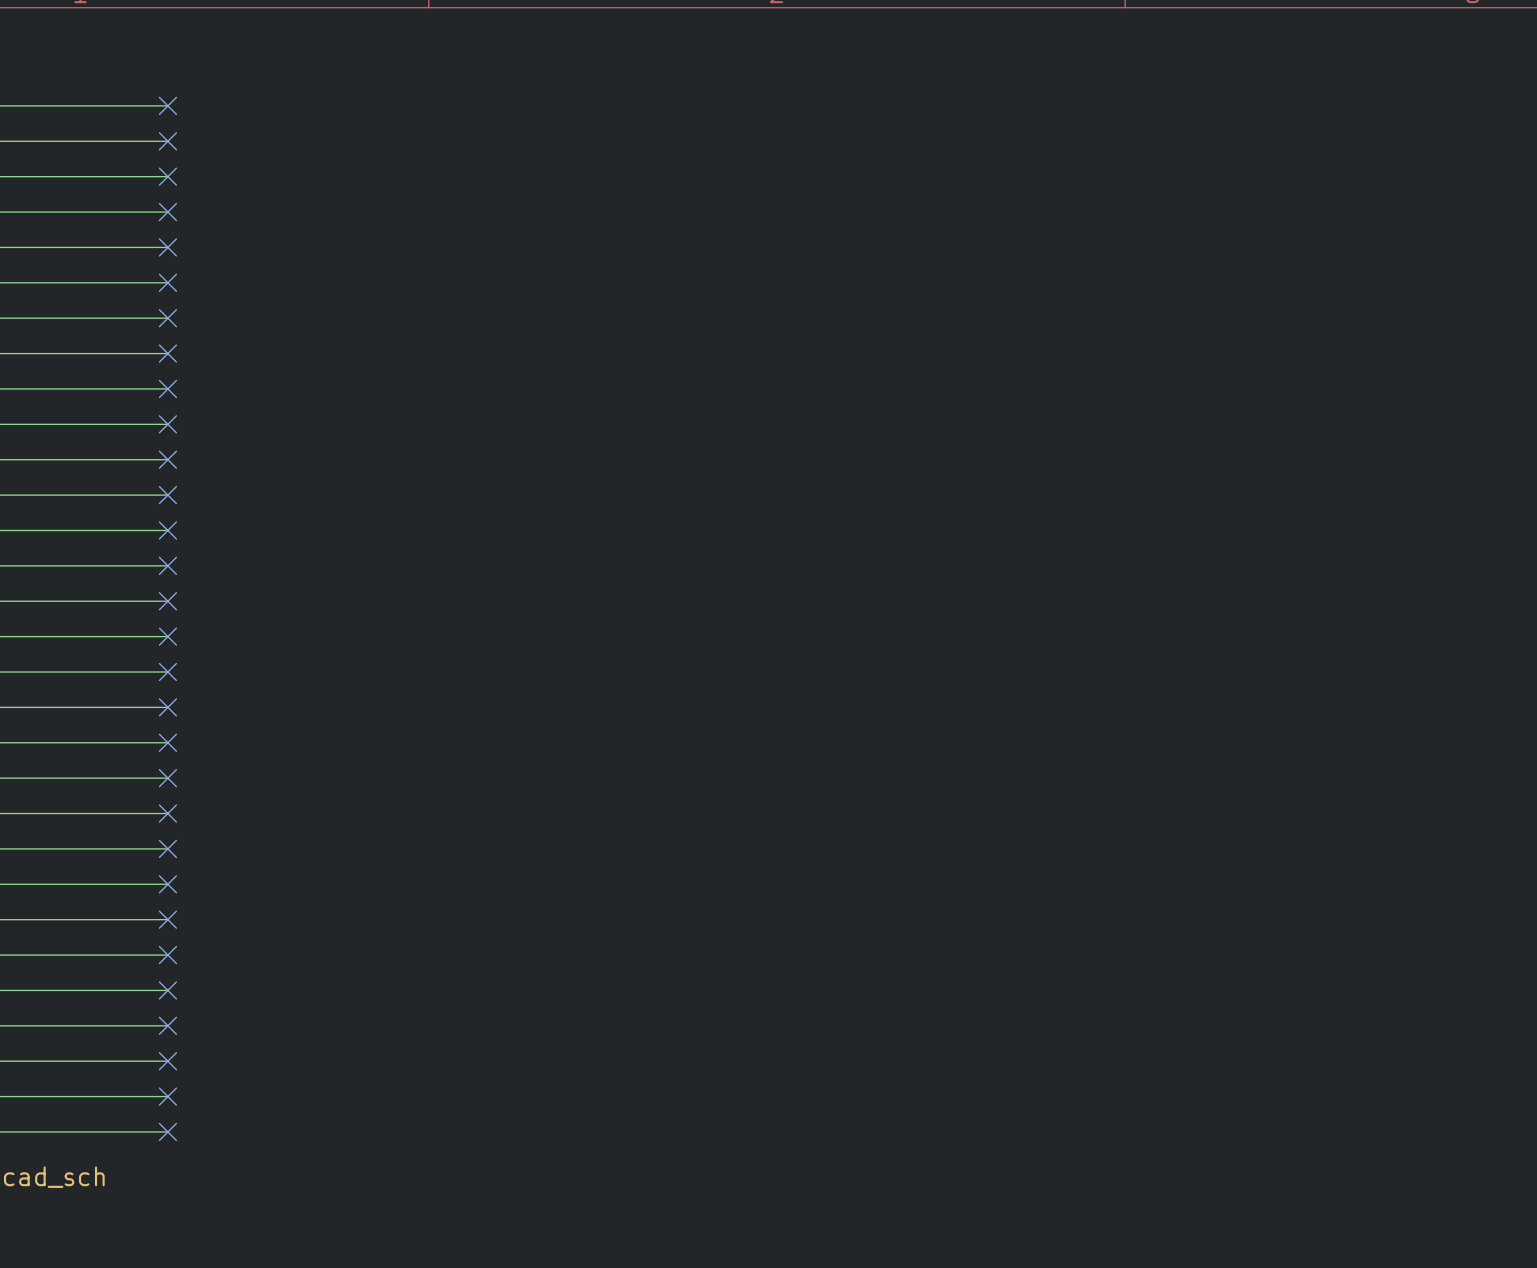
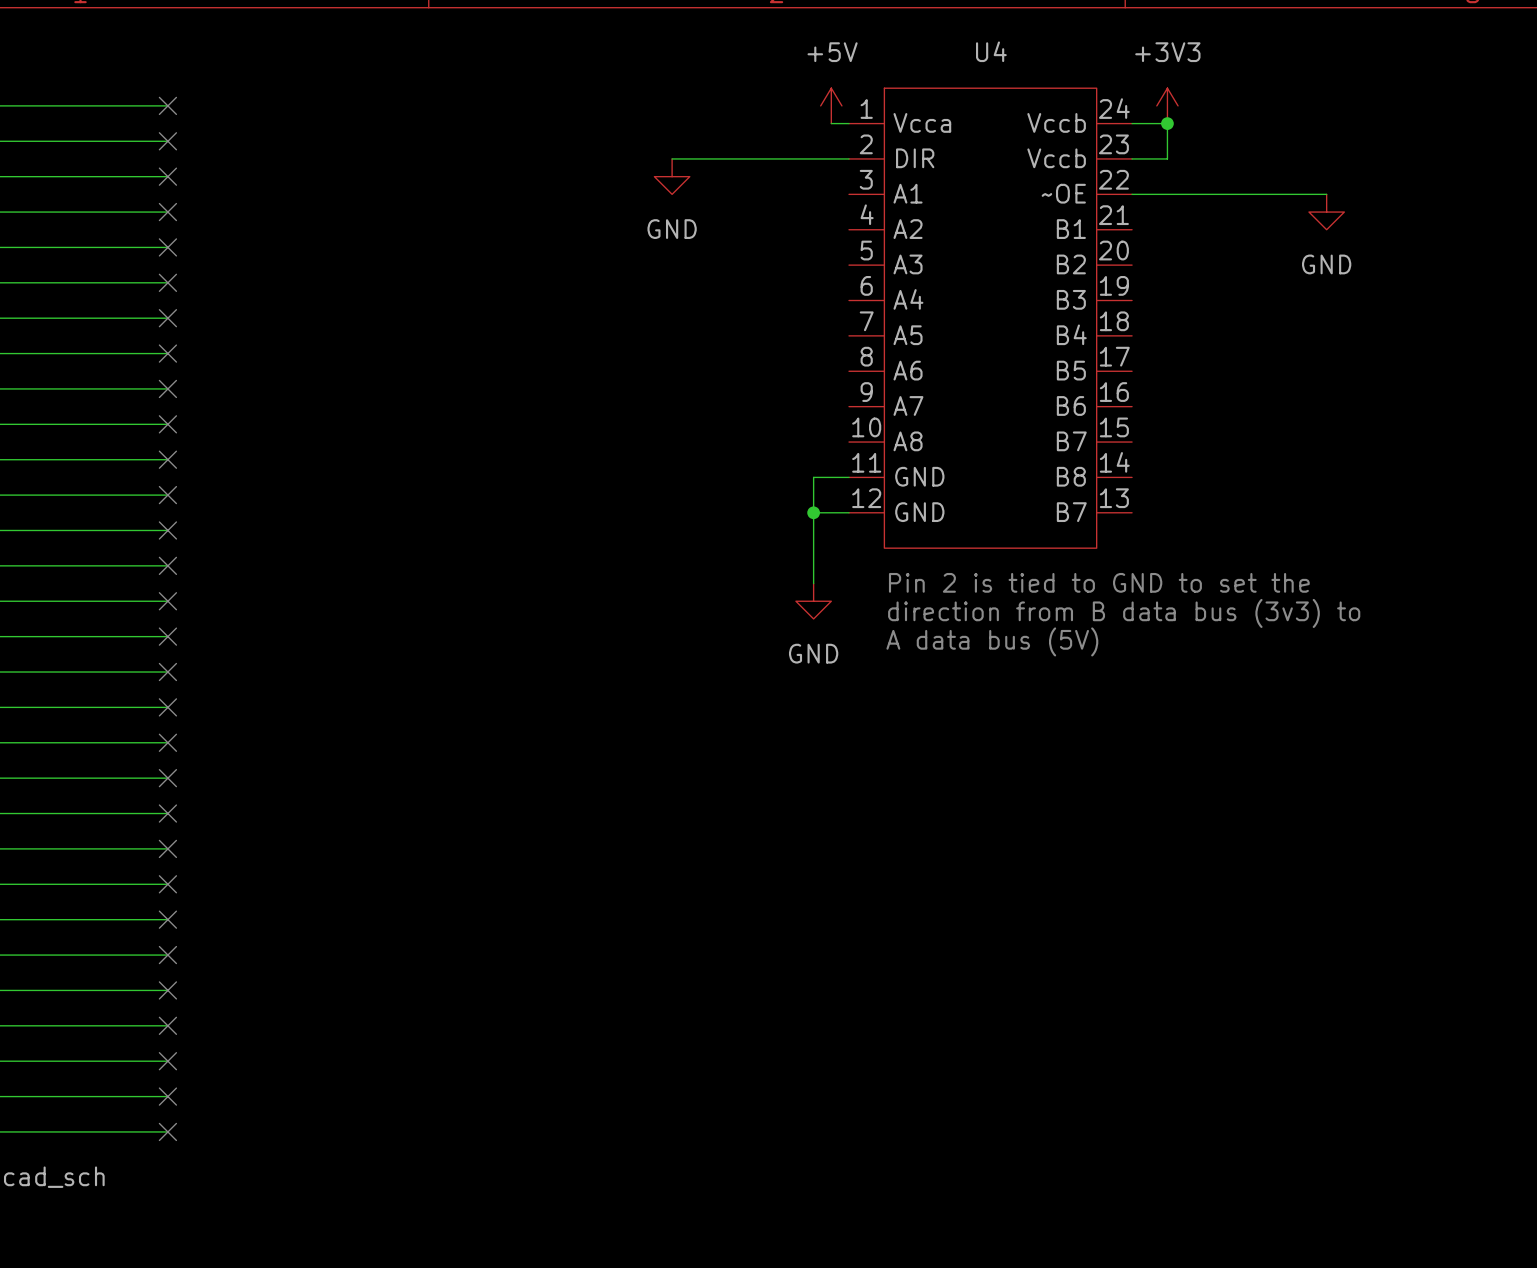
power symbol: none -> +5V (831, 105)
power symbol: none -> +3V3 (1167, 105)
wire: none -> (831, 123) (849, 123)
wire: none -> (1132, 123) (1167, 123) (1167, 158) (1132, 158)
junction: none -> (1167, 123)
wire: none -> (672, 158) (849, 158)
power symbol: none -> GND (672, 176)
wire: none -> (1132, 194) (1326, 194)
power symbol: none -> GND (1326, 212)
U4: none -> (990, 318)
wire: none -> (849, 477) (813, 477) (813, 583)
wire: none -> (813, 512) (849, 512)
junction: none -> (813, 512)
text: none -> Pin 2 is tied to GND to set the (1099, 582)
power symbol: none -> GND (813, 601)
text: none -> direction from B data bus (3v3) to (1124, 613)
text: none -> A data bus (5V) (992, 641)

